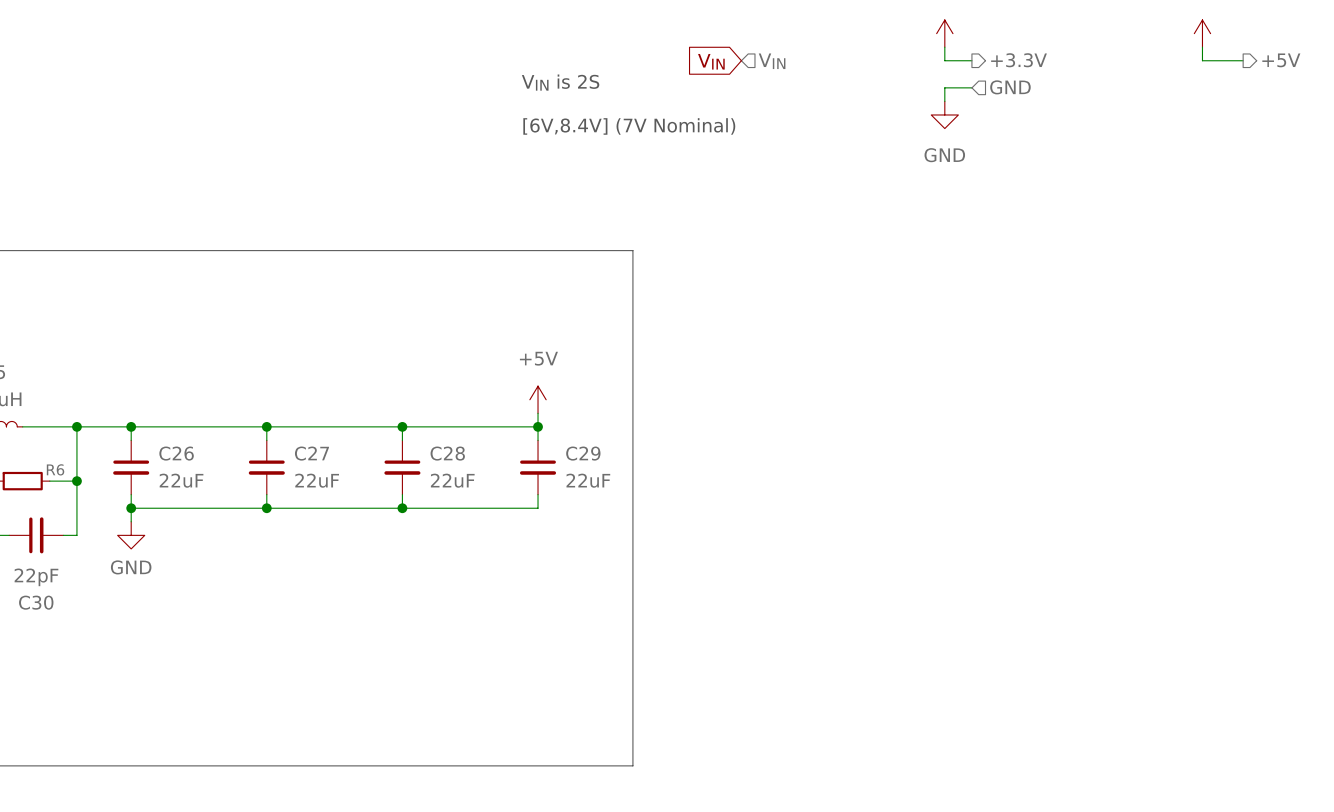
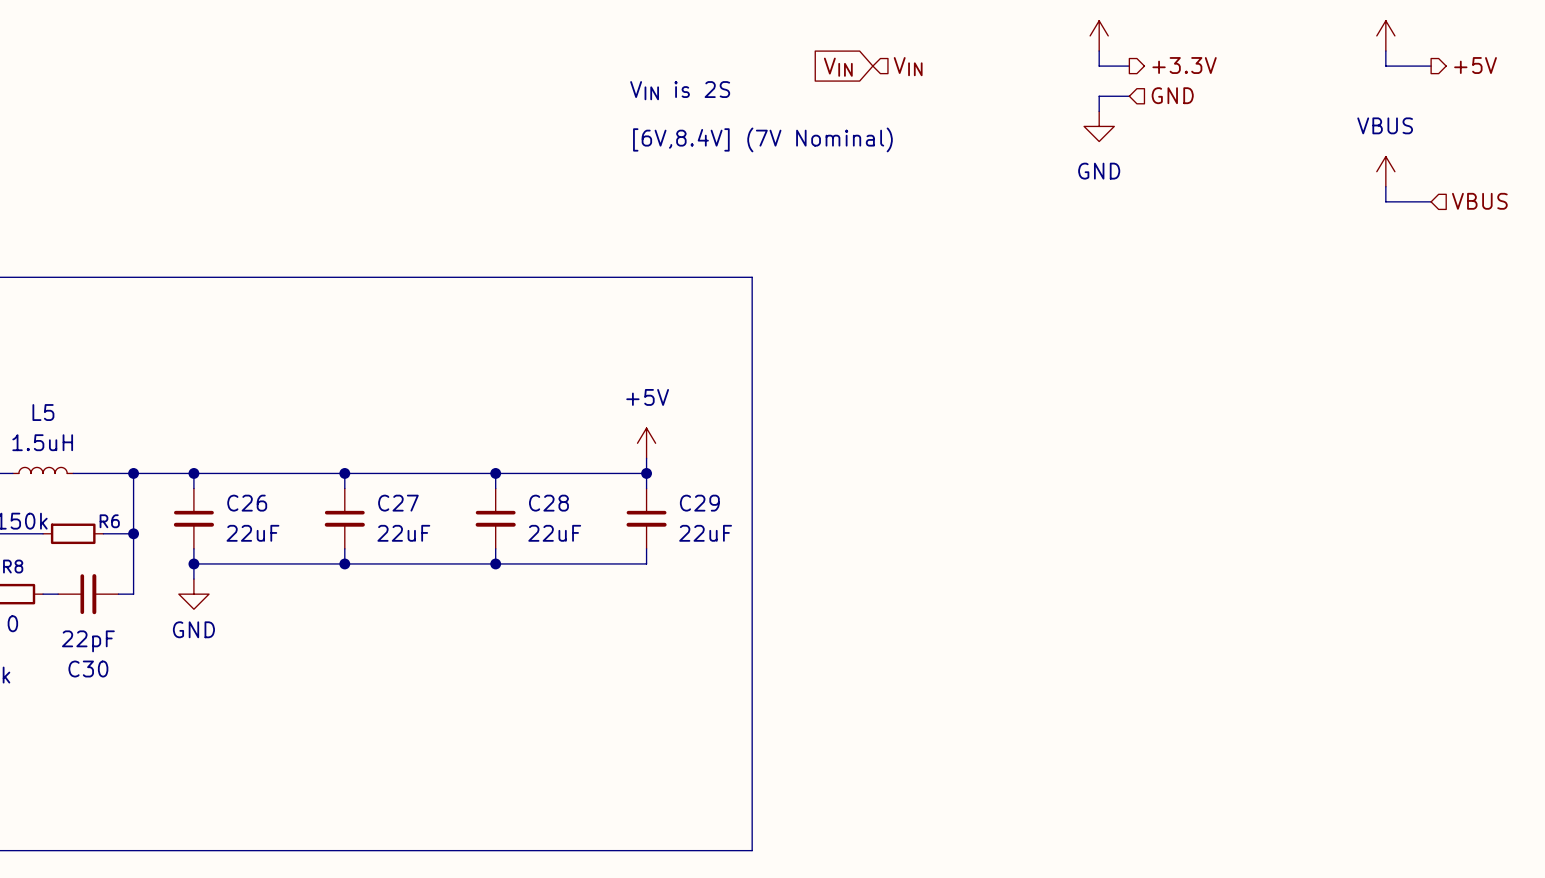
power symbol: none -> VBUS (1385, 171)
wire: none -> (1385, 186) (1385, 201) (1431, 201)
hierarchical label: none -> VBUS (1479, 201)

